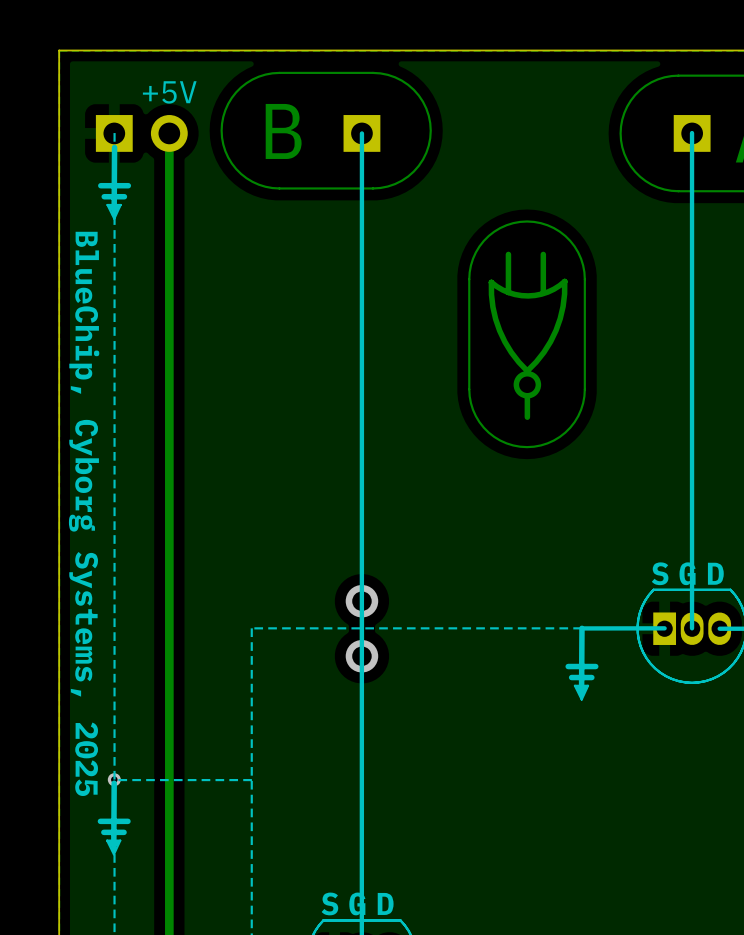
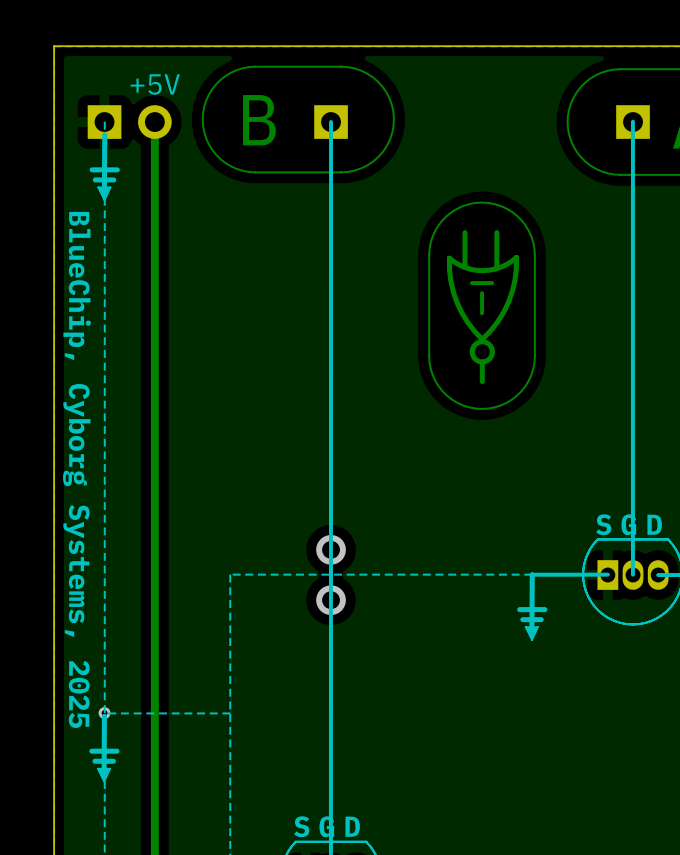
track: none -> (492, 283) (471, 283)
track: none -> (482, 293) (482, 313)

